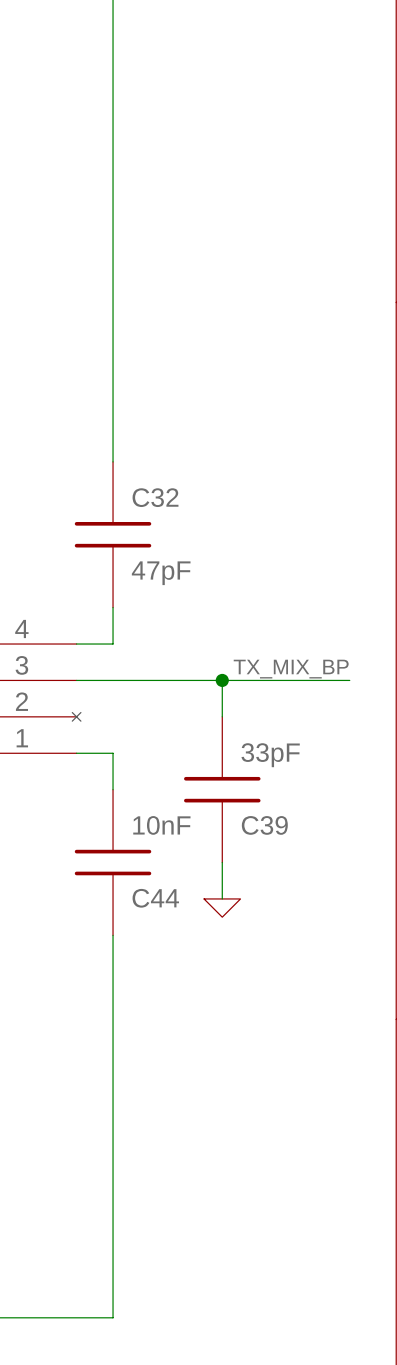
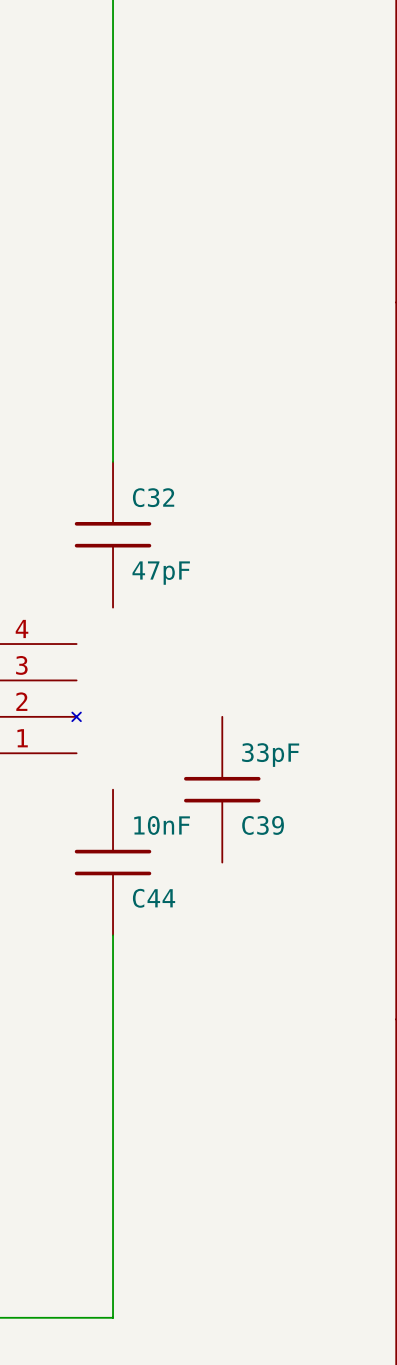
wire: (113, 607) (113, 644) (76, 644) -> none
label: TX_MIX_BP (291, 669) -> none
wire: (76, 680) (349, 680) -> none
wire: (222, 680) (222, 716) -> none
junction: (222, 680) -> none
wire: (76, 753) (113, 753) (113, 789) -> none
wire: (222, 862) (222, 898) -> none
power symbol: (222, 908) -> none

